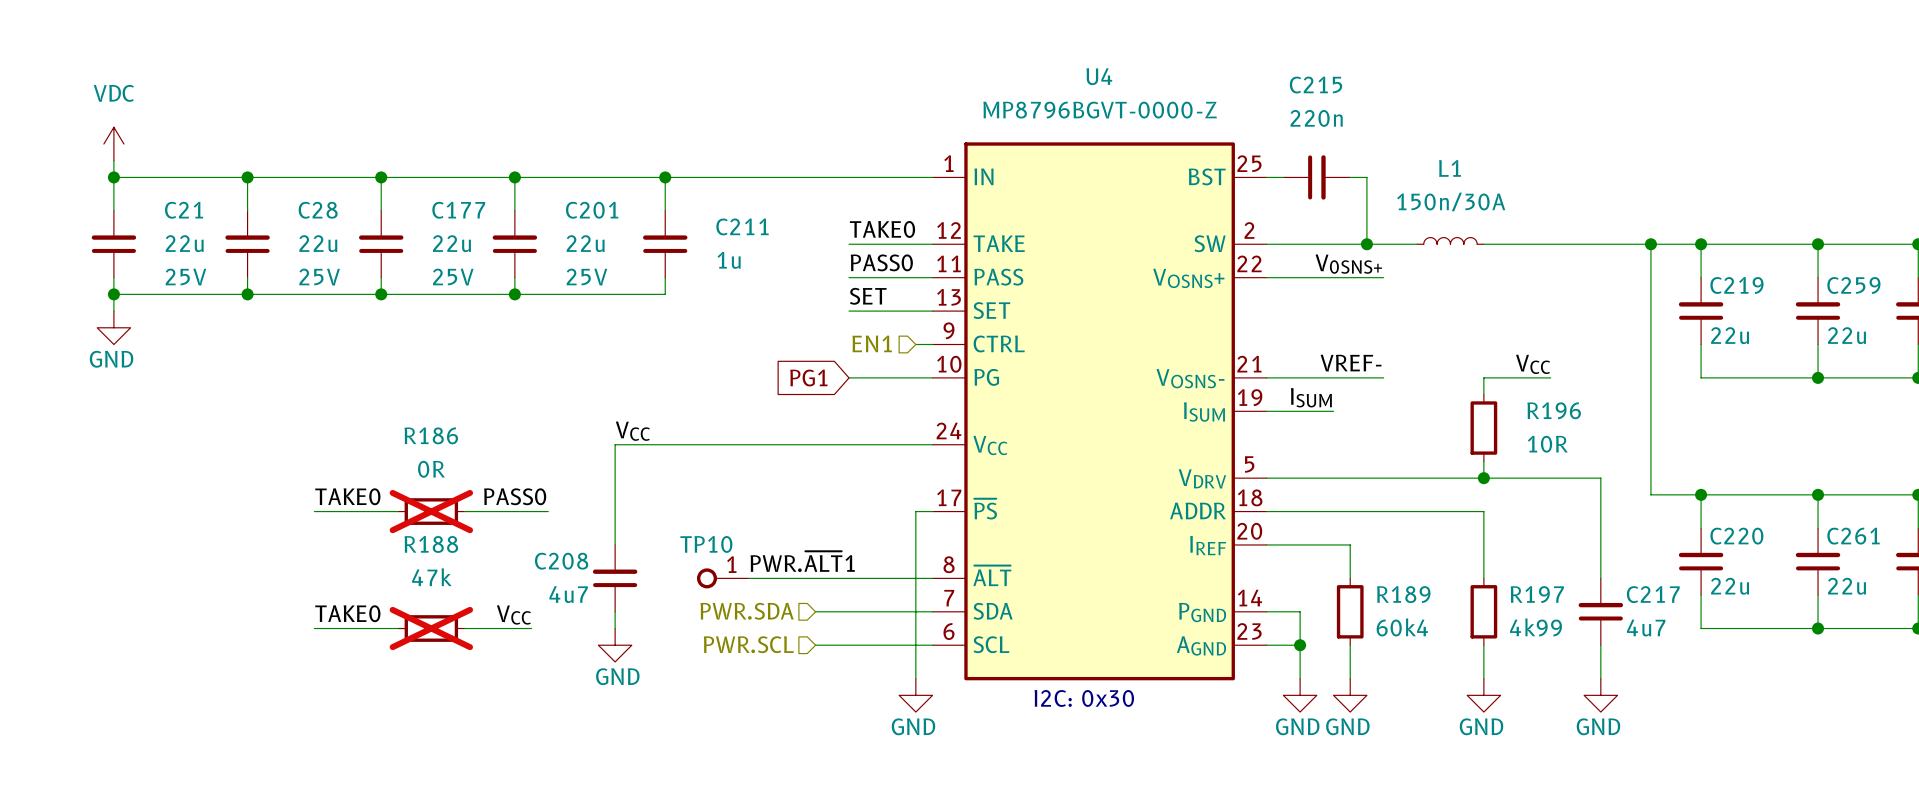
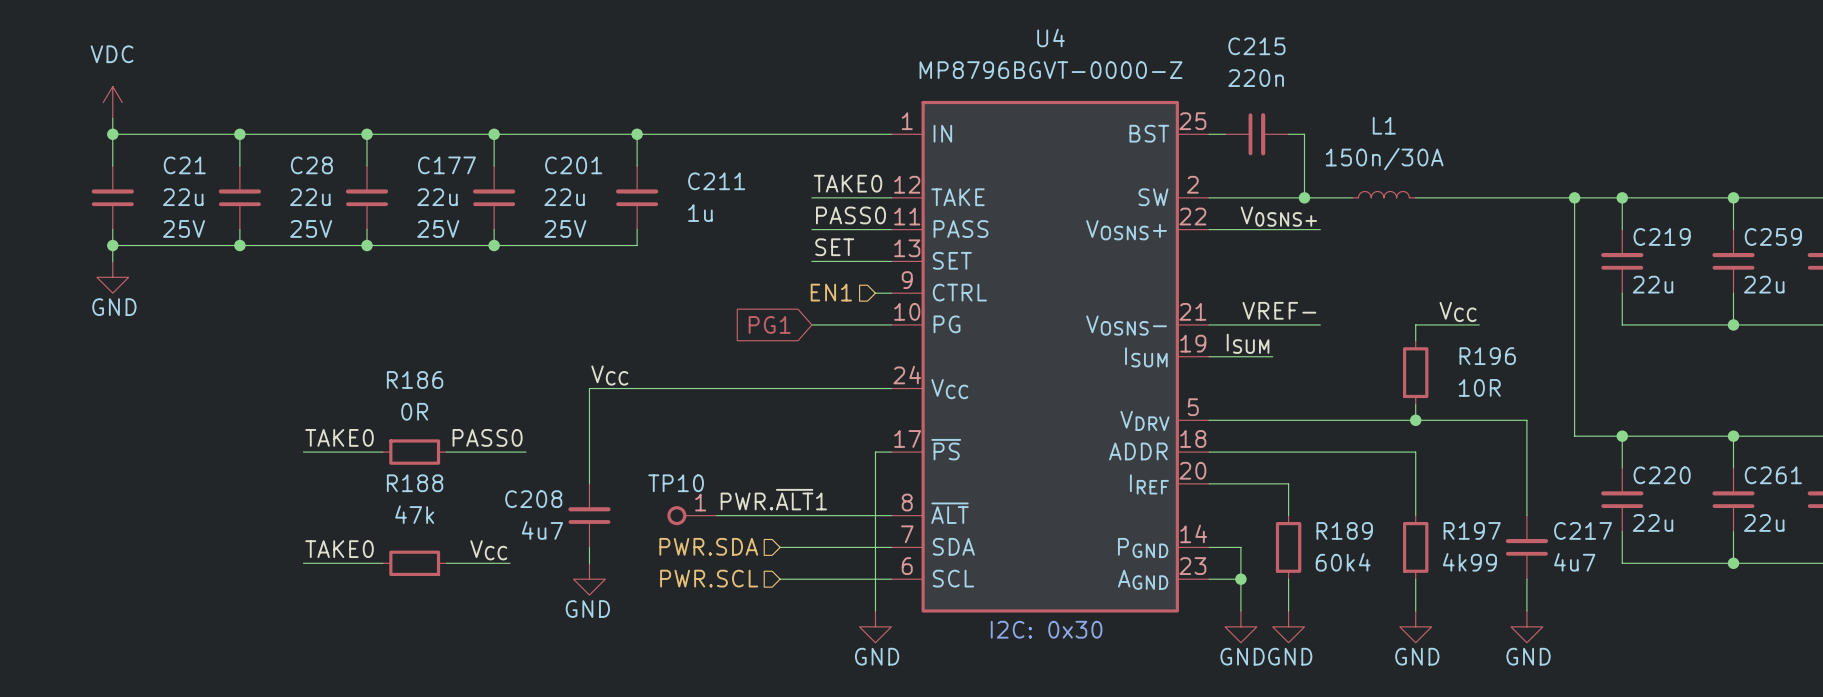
R186 do-not-place cross: (431, 511) -> none
R188 do-not-place cross: (431, 628) -> none

